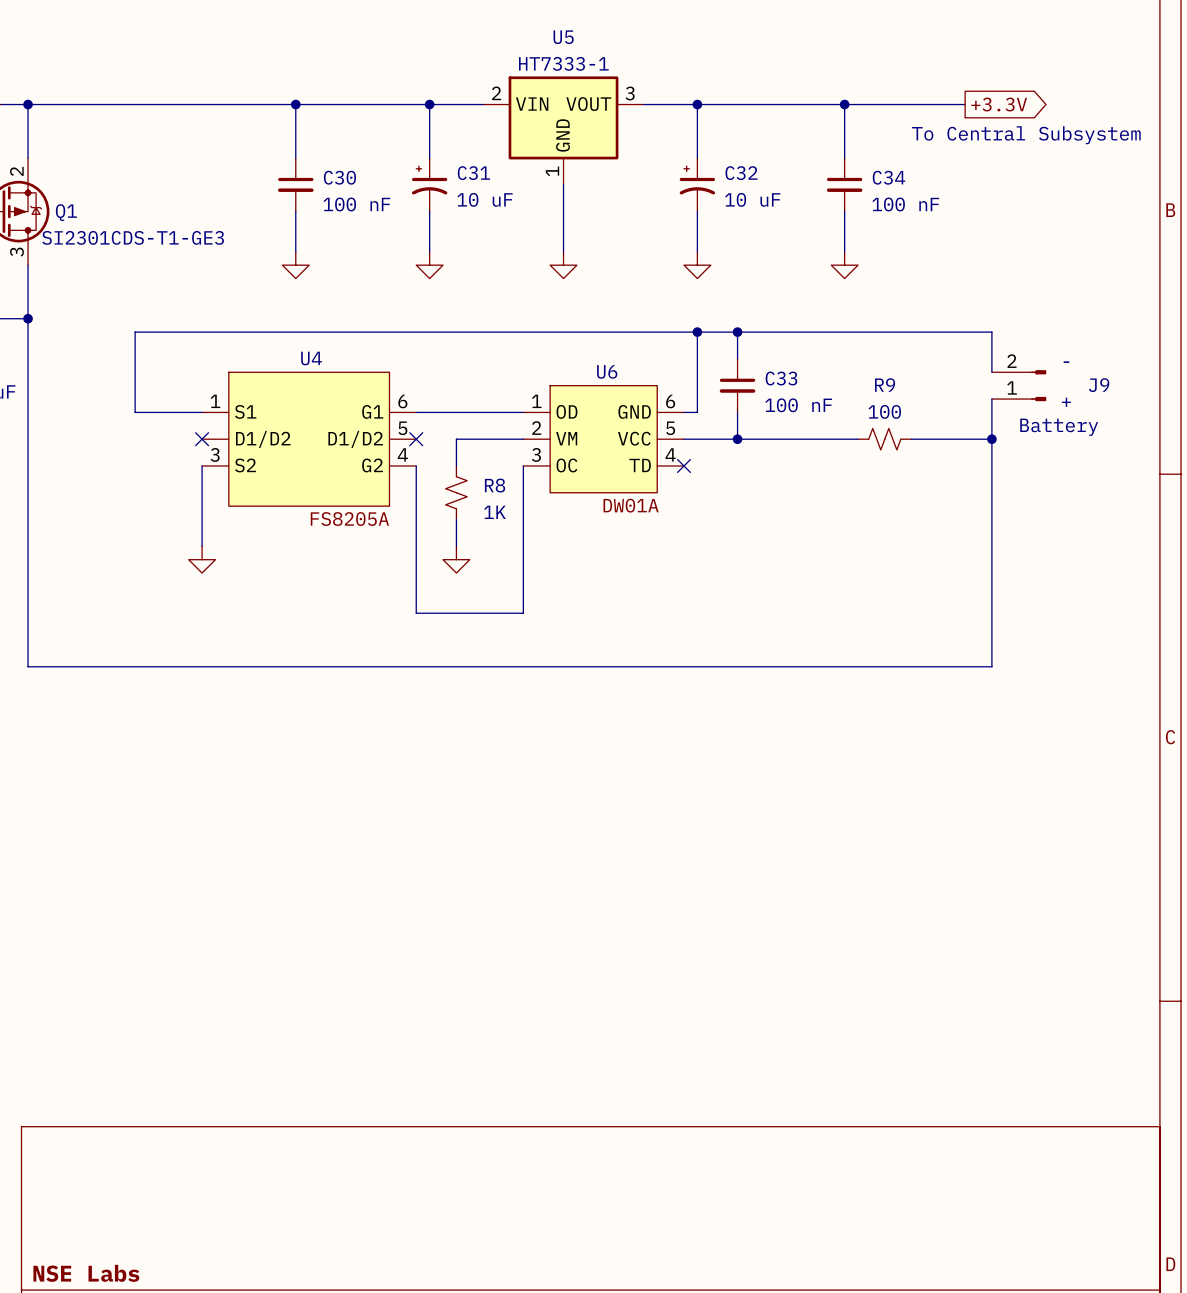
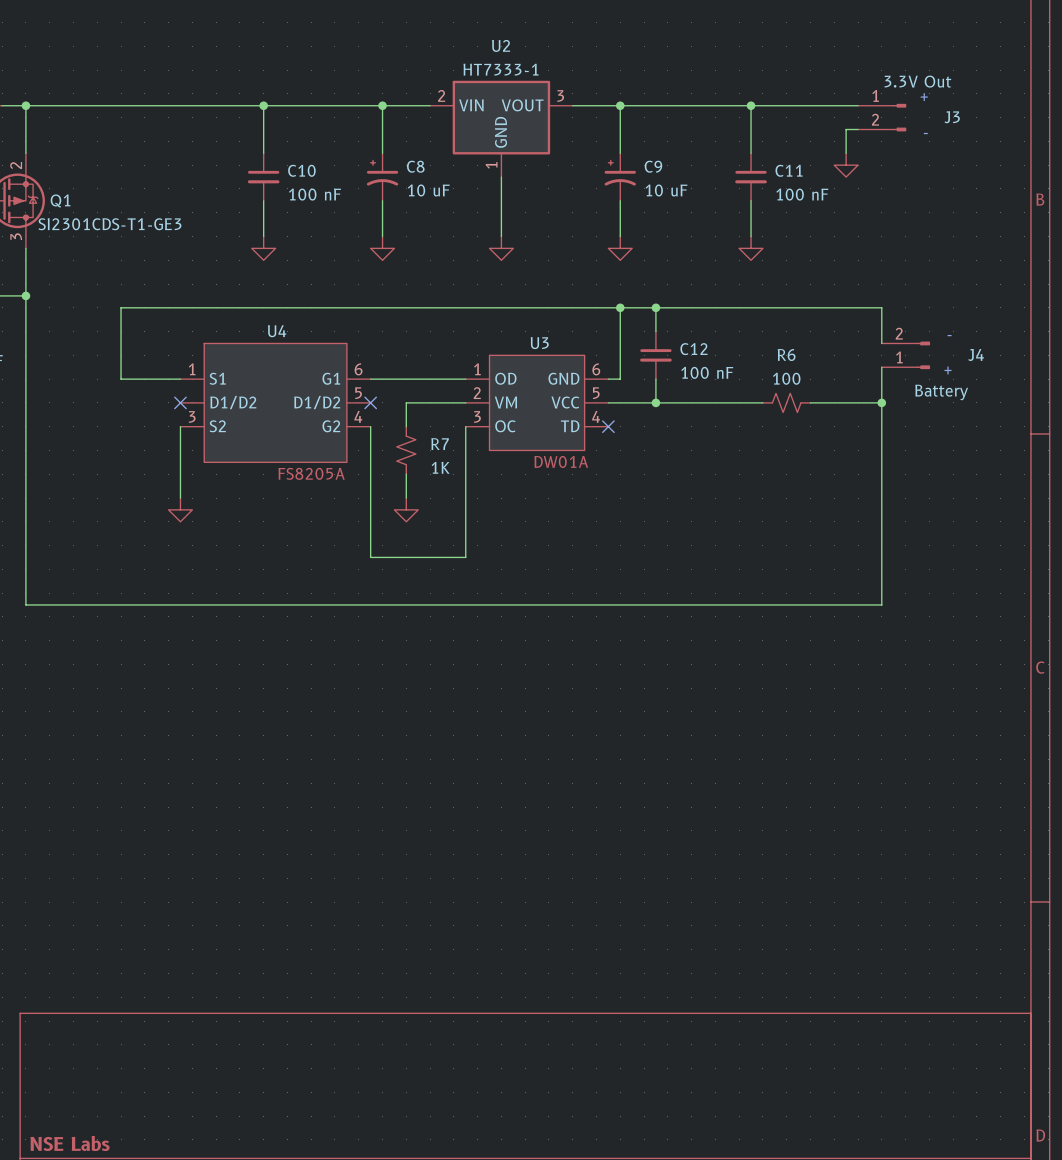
U5 name: U5 (563, 37) -> U2 (501, 45)
text: none -> + (924, 97)
global label: +3.3V (999, 104) -> none
J3: none -> 3.3V Out (882, 117)
wire: none -> (858, 129) (846, 129) (846, 153)
text: none -> - (925, 133)
text: To Central Subsystem (1026, 135) -> none
power symbol: none -> (846, 165)
C31 name: C31 (473, 173) -> C8 (415, 166)
C32 name: C32 (741, 173) -> C9 (653, 166)
C30 name: C30 (339, 177) -> C10 (301, 170)
C34 name: C34 (888, 177) -> C11 (789, 170)
U6 name: U6 (607, 371) -> U3 (539, 343)
C33 name: C33 (781, 378) -> C12 (693, 349)
R9 name: R9 (885, 385) -> R6 (786, 354)
J9 name: J9 (1099, 385) -> J4 (976, 354)
R8 name: R8 (495, 485) -> R7 (440, 444)

